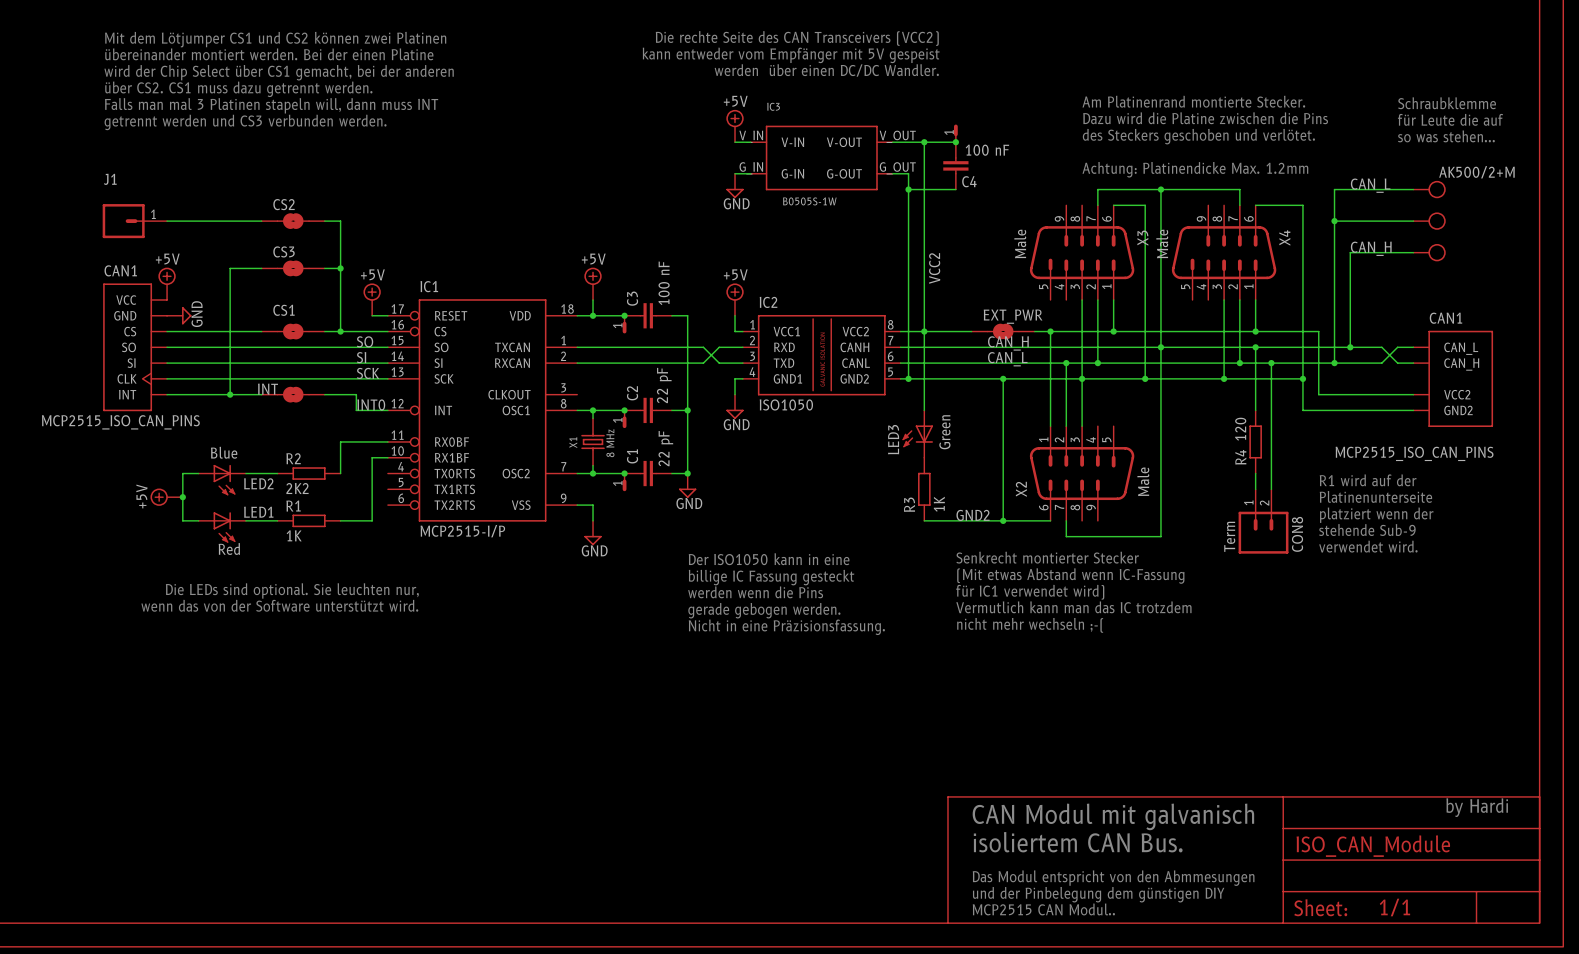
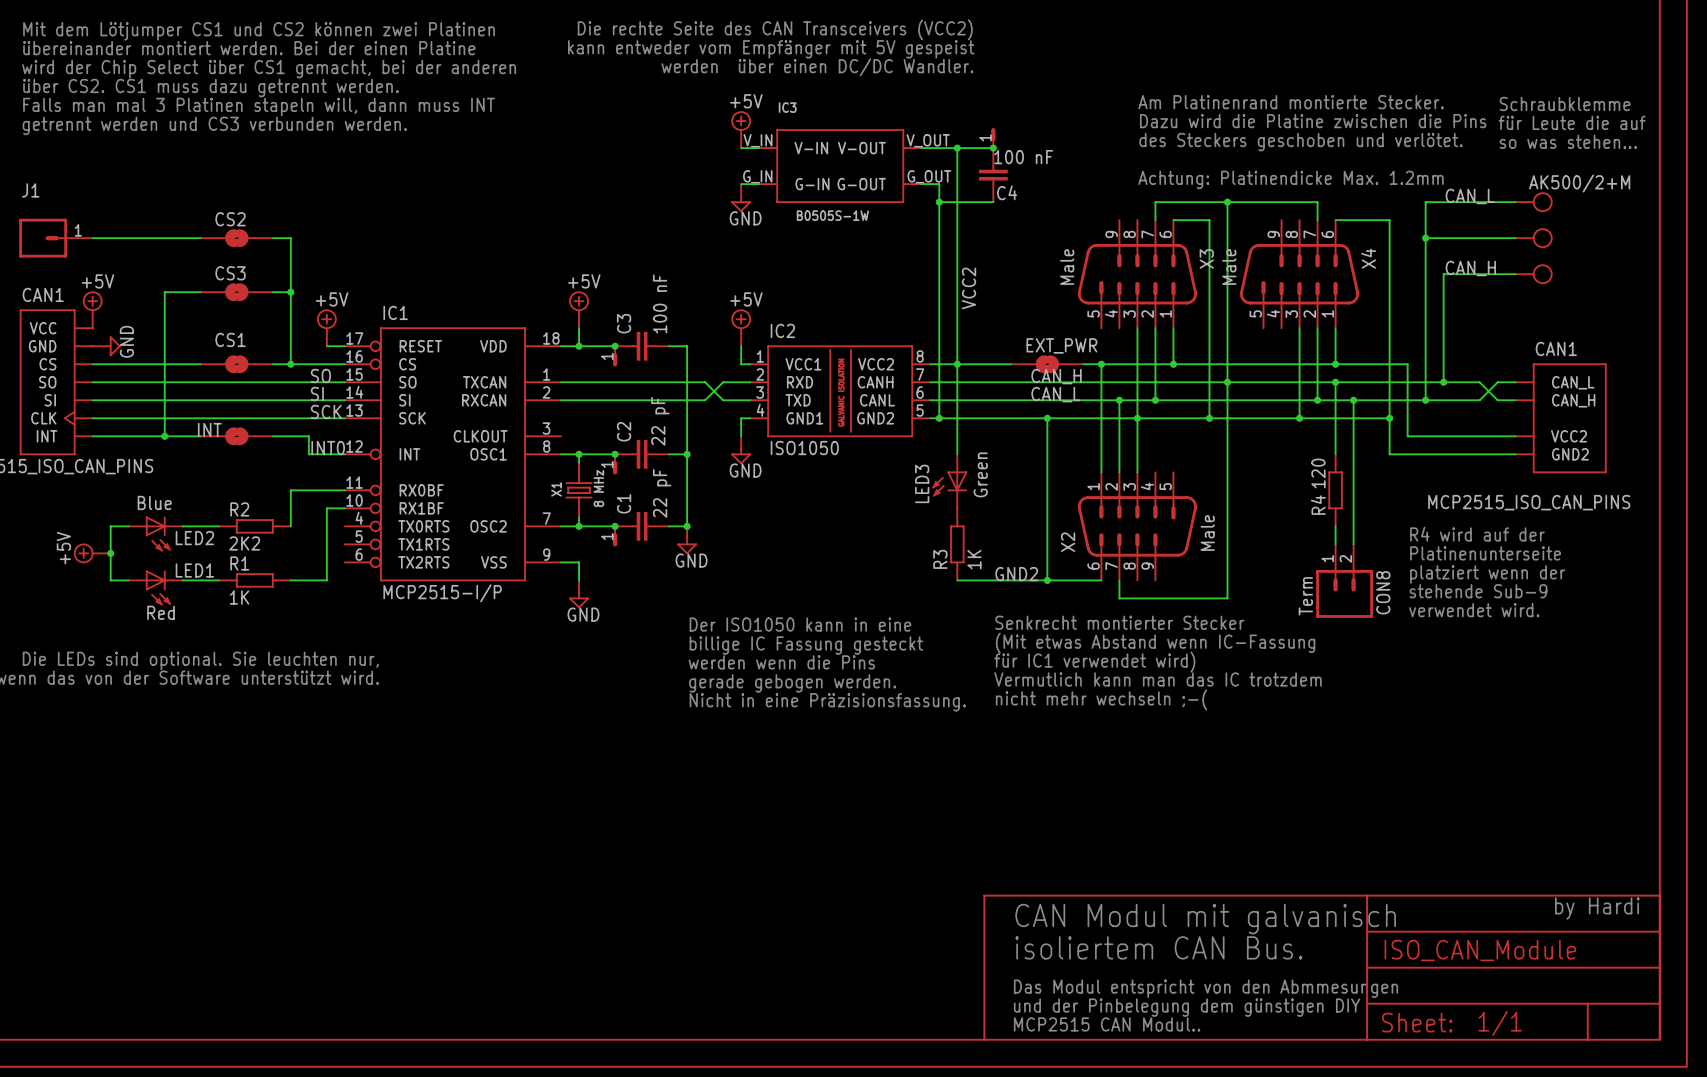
text: R1 wird auf der (1368, 480) -> R4 wird auf der (1477, 534)

